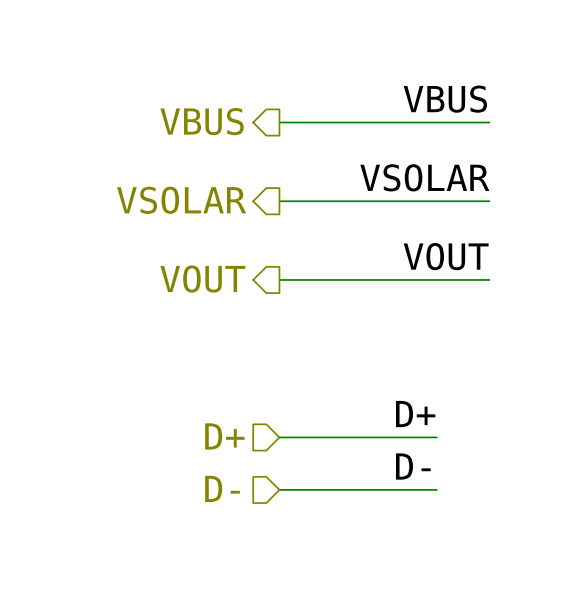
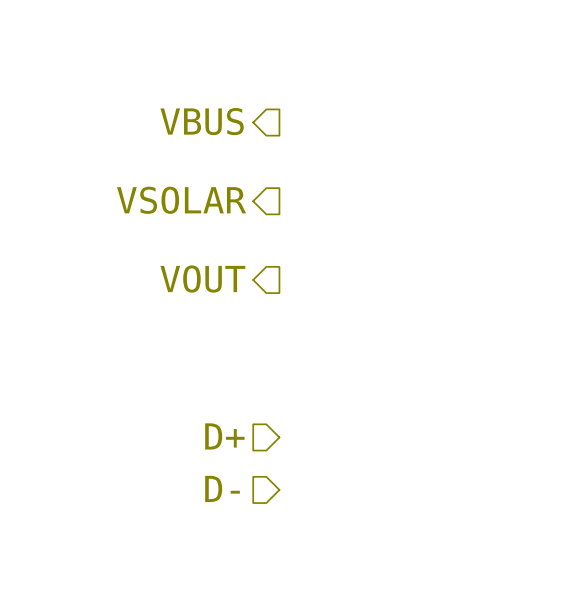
label: VBUS (445, 99) -> none
wire: (279, 122) (489, 122) -> none
label: VSOLAR (424, 177) -> none
wire: (279, 201) (489, 201) -> none
label: VOUT (446, 256) -> none
wire: (279, 279) (489, 279) -> none
label: D+ (415, 414) -> none
wire: (279, 437) (436, 437) -> none
label: D- (413, 466) -> none
wire: (279, 489) (436, 489) -> none

